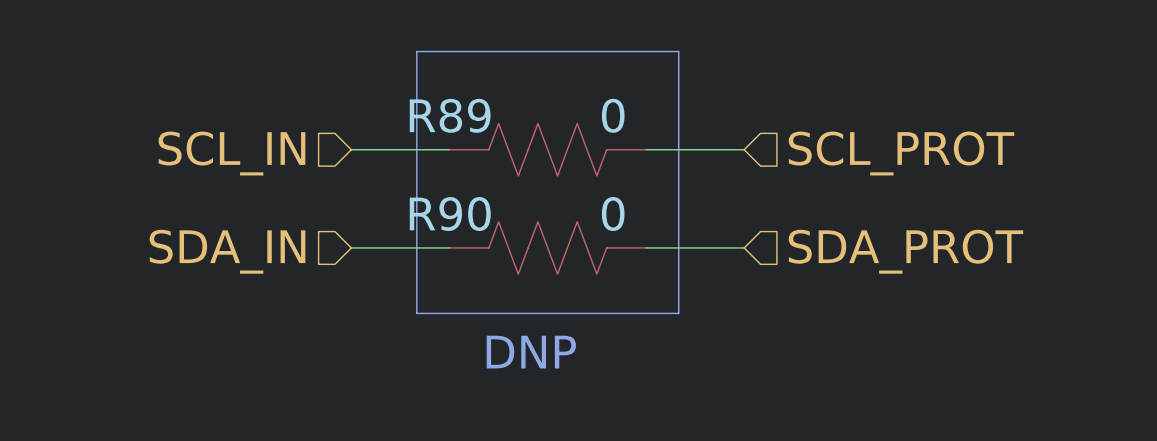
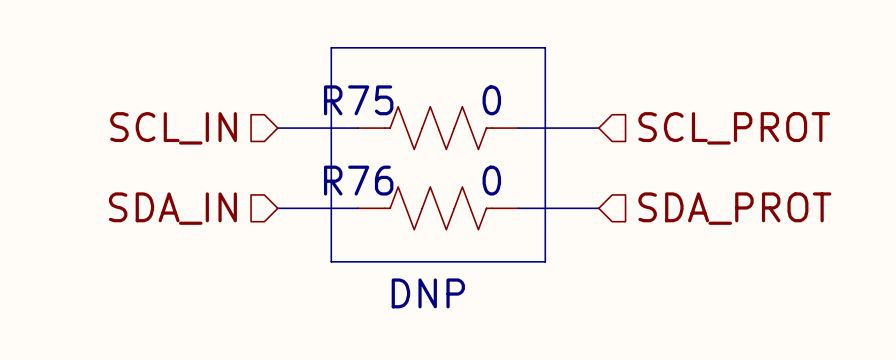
R89 name: R89 (450, 115) -> R75 (358, 100)
R90 name: R90 (450, 214) -> R76 (358, 180)

